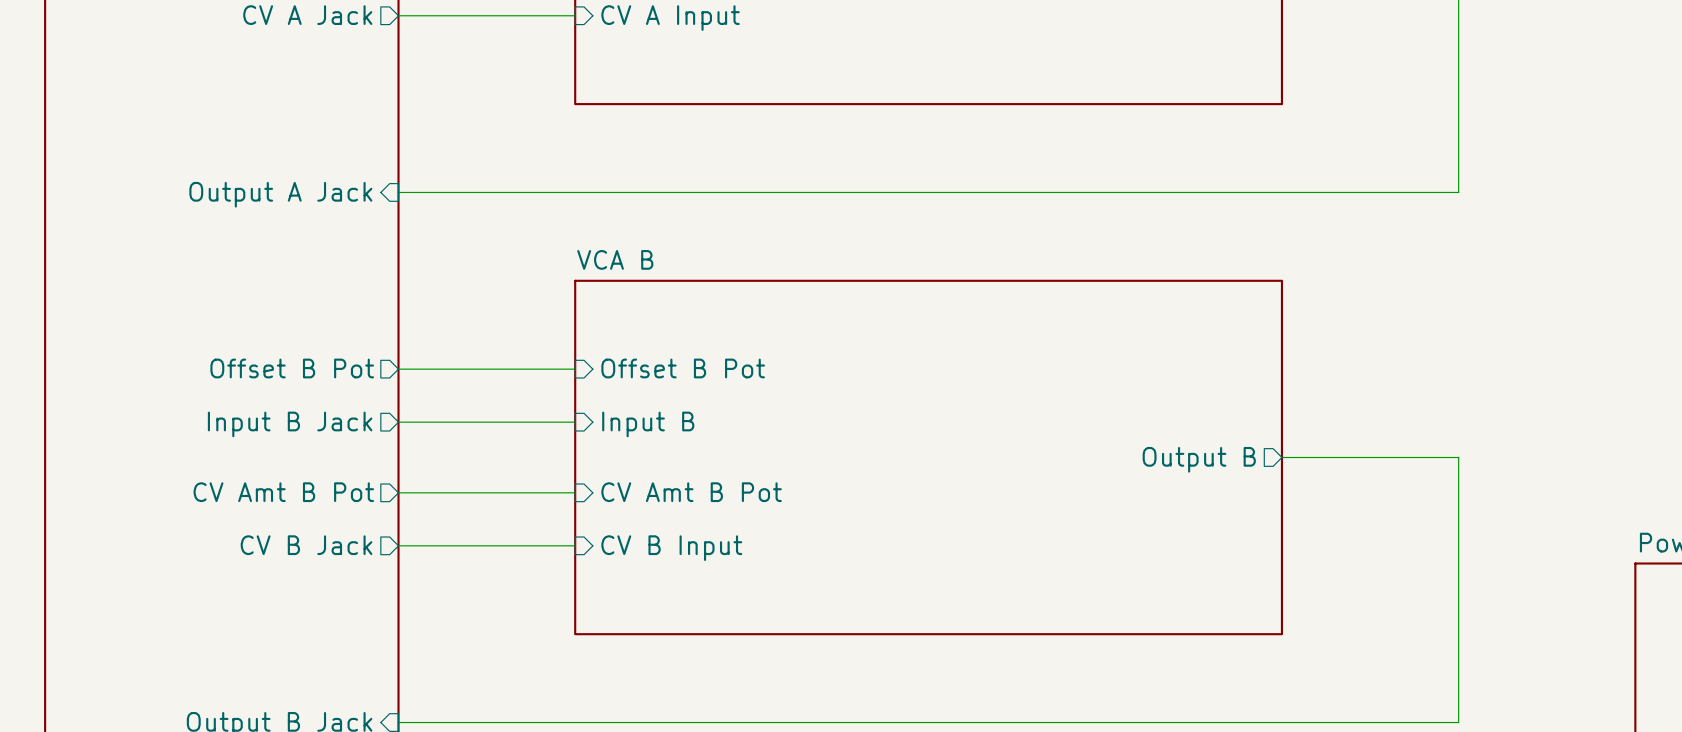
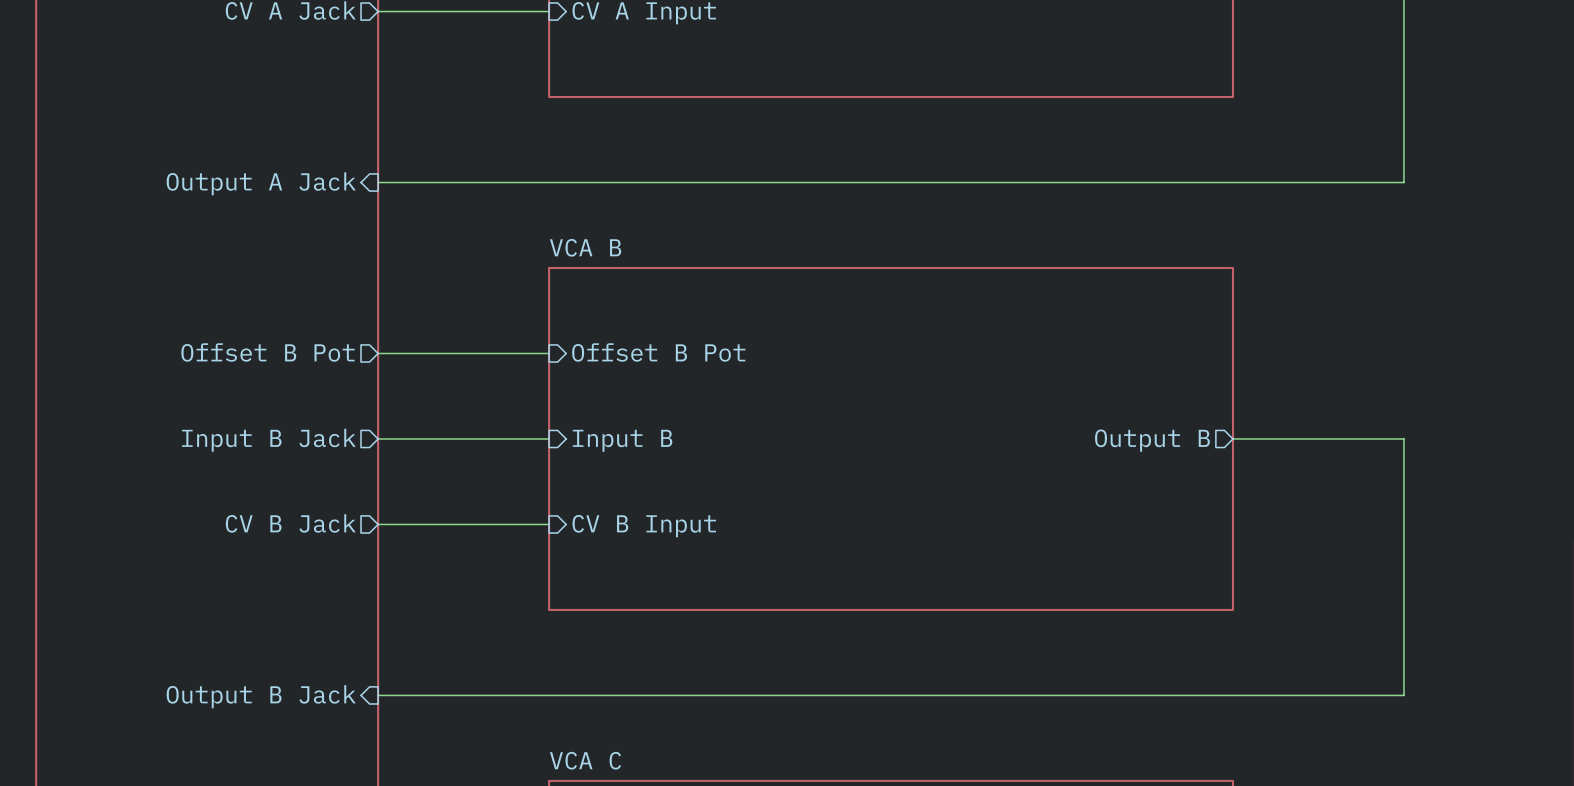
wire: (398, 422) (575, 422) -> none
sheet pin position: Input B Jack (290, 424) -> Input B Jack (268, 440)
sheet pin position: Input B (648, 424) -> Input B (622, 440)
sheet pin: CV Amt B Pot (283, 492) -> none
wire: (398, 492) (575, 492) -> (378, 438) (549, 438)
sheet pin: CV Amt B Pot (691, 492) -> none

